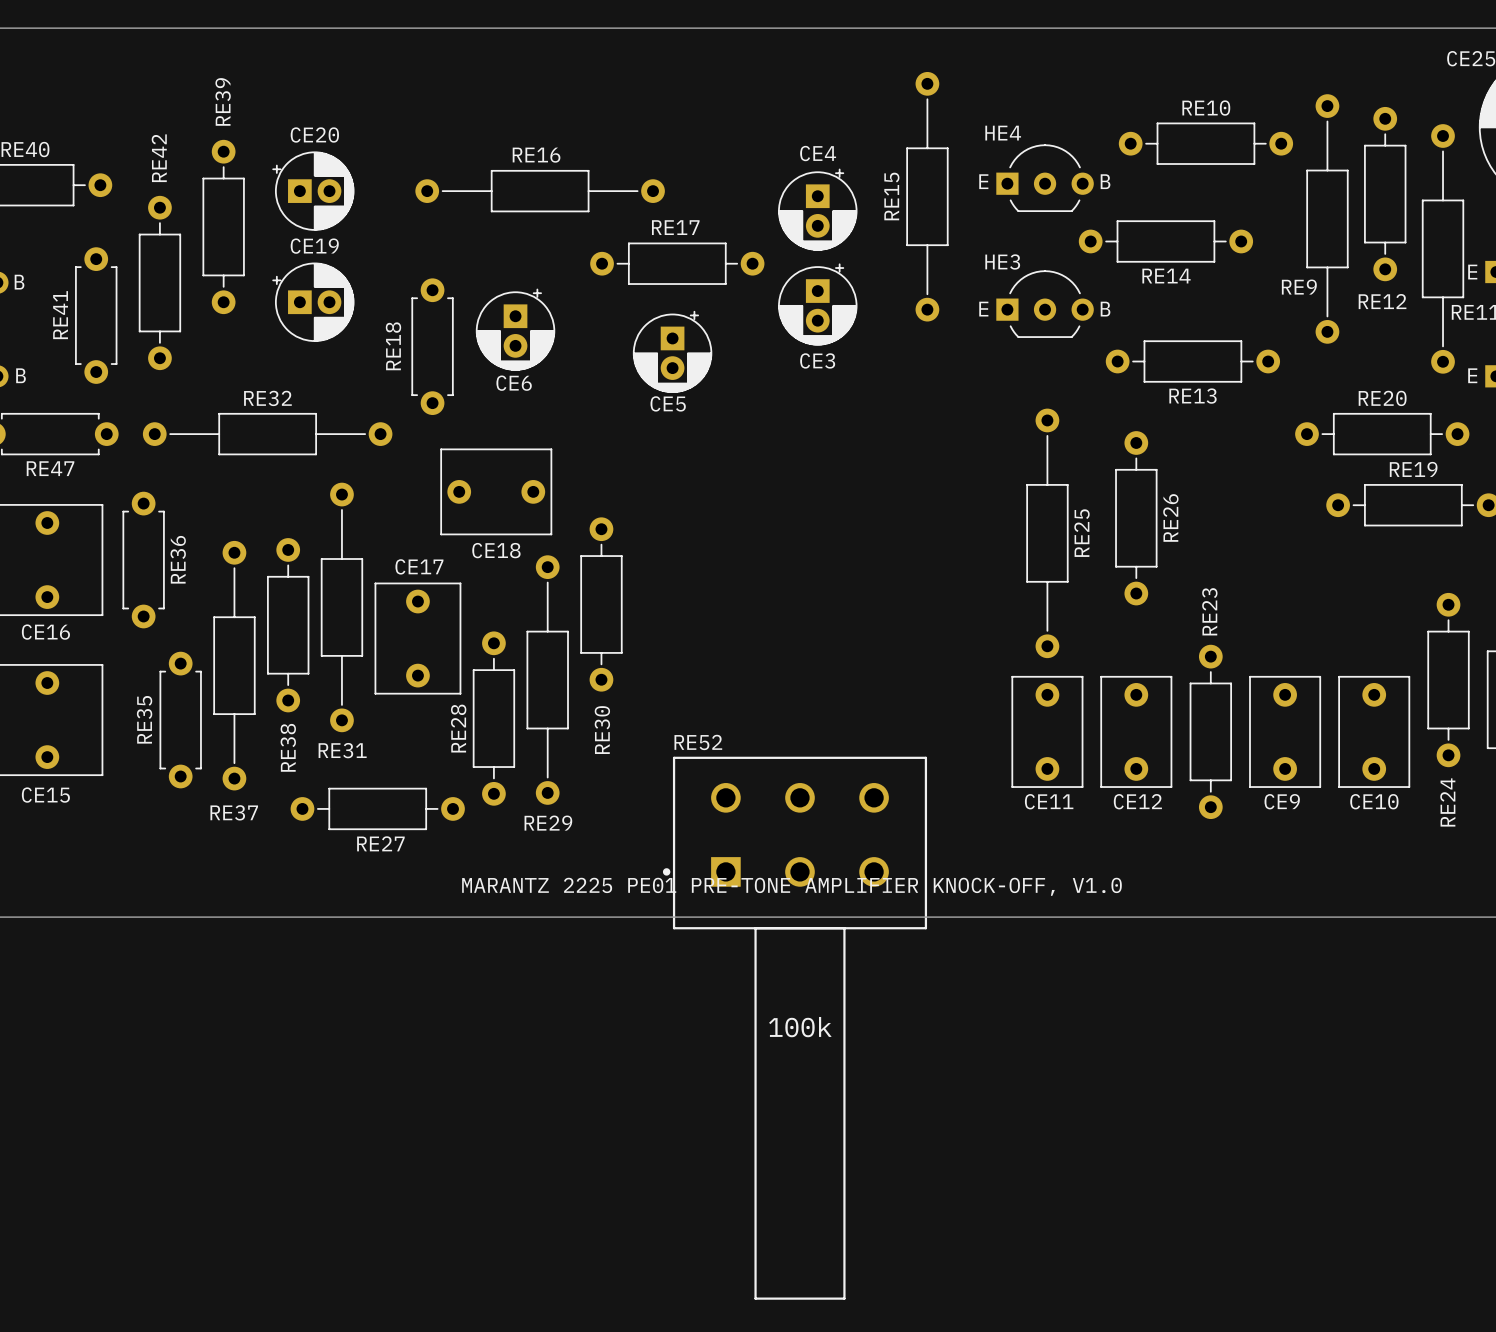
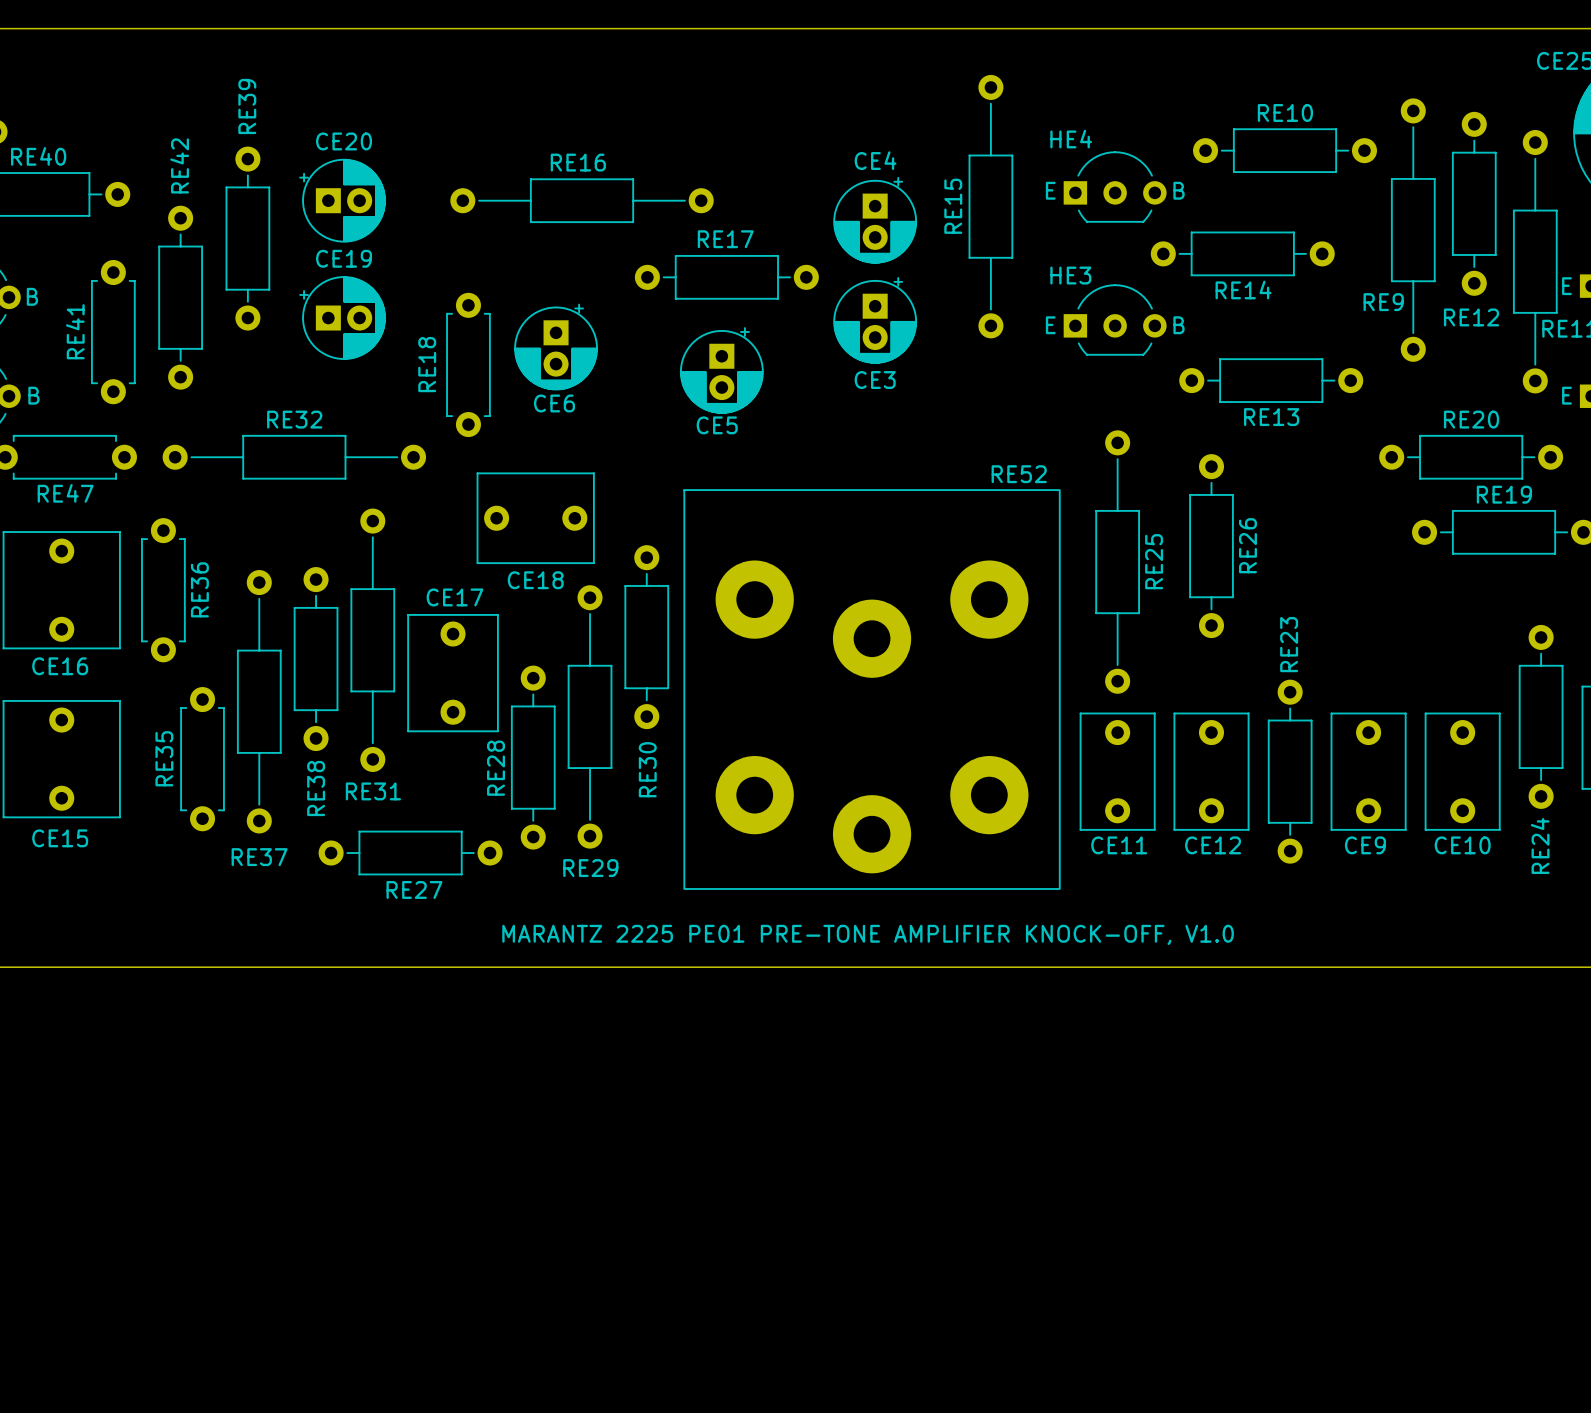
RE52 name position: RE52 (698, 742) -> RE52 (1019, 474)
RE52 footprint: [662, 756, 928, 1300] -> [683, 489, 1061, 890]
RE52 value: 100k (800, 1027) -> none

